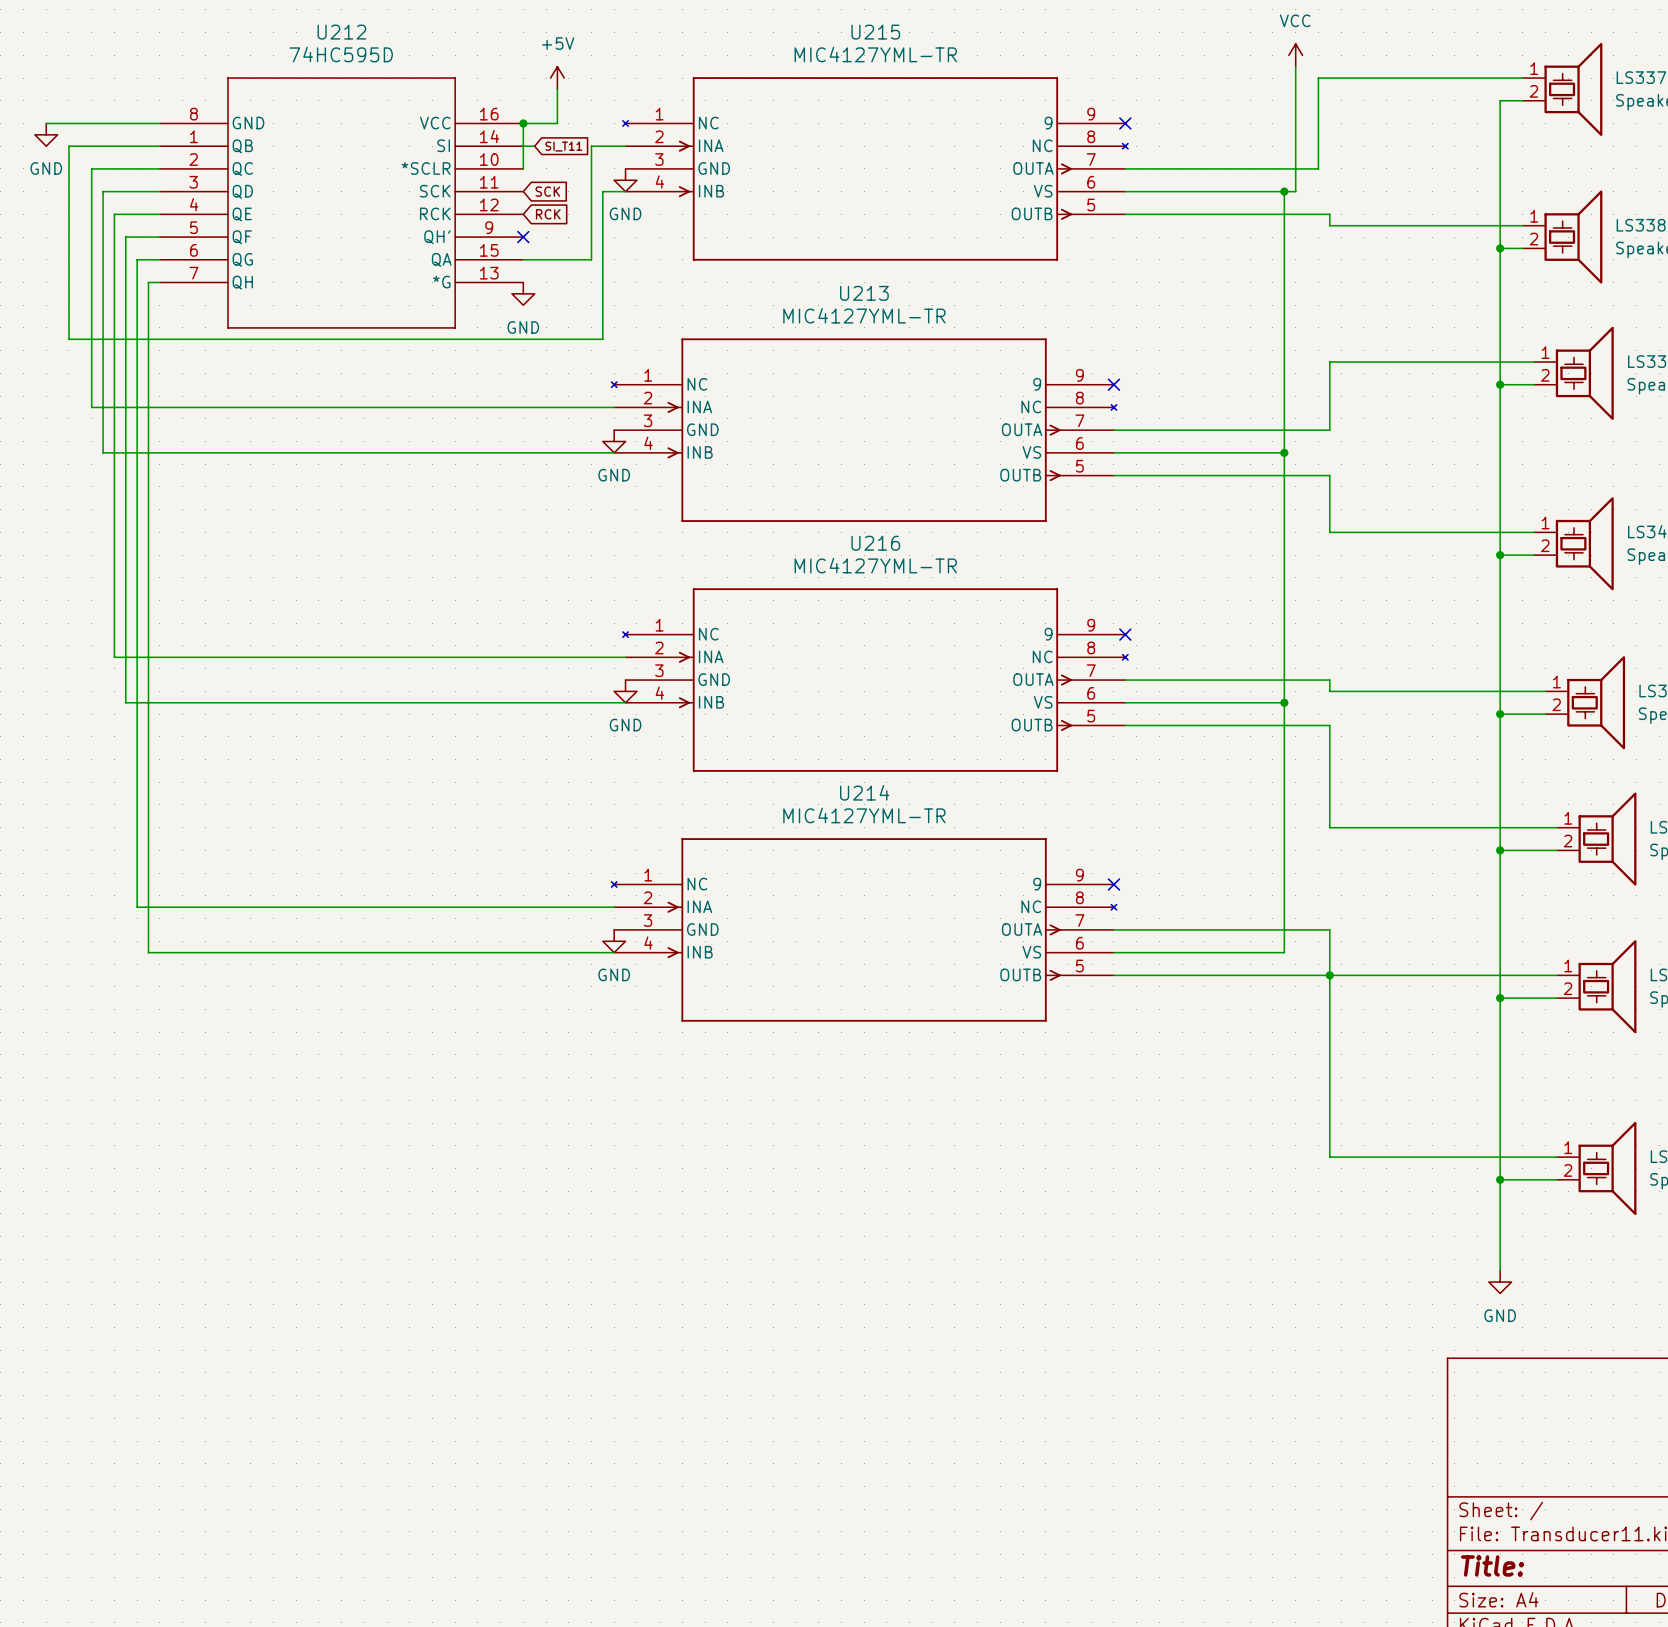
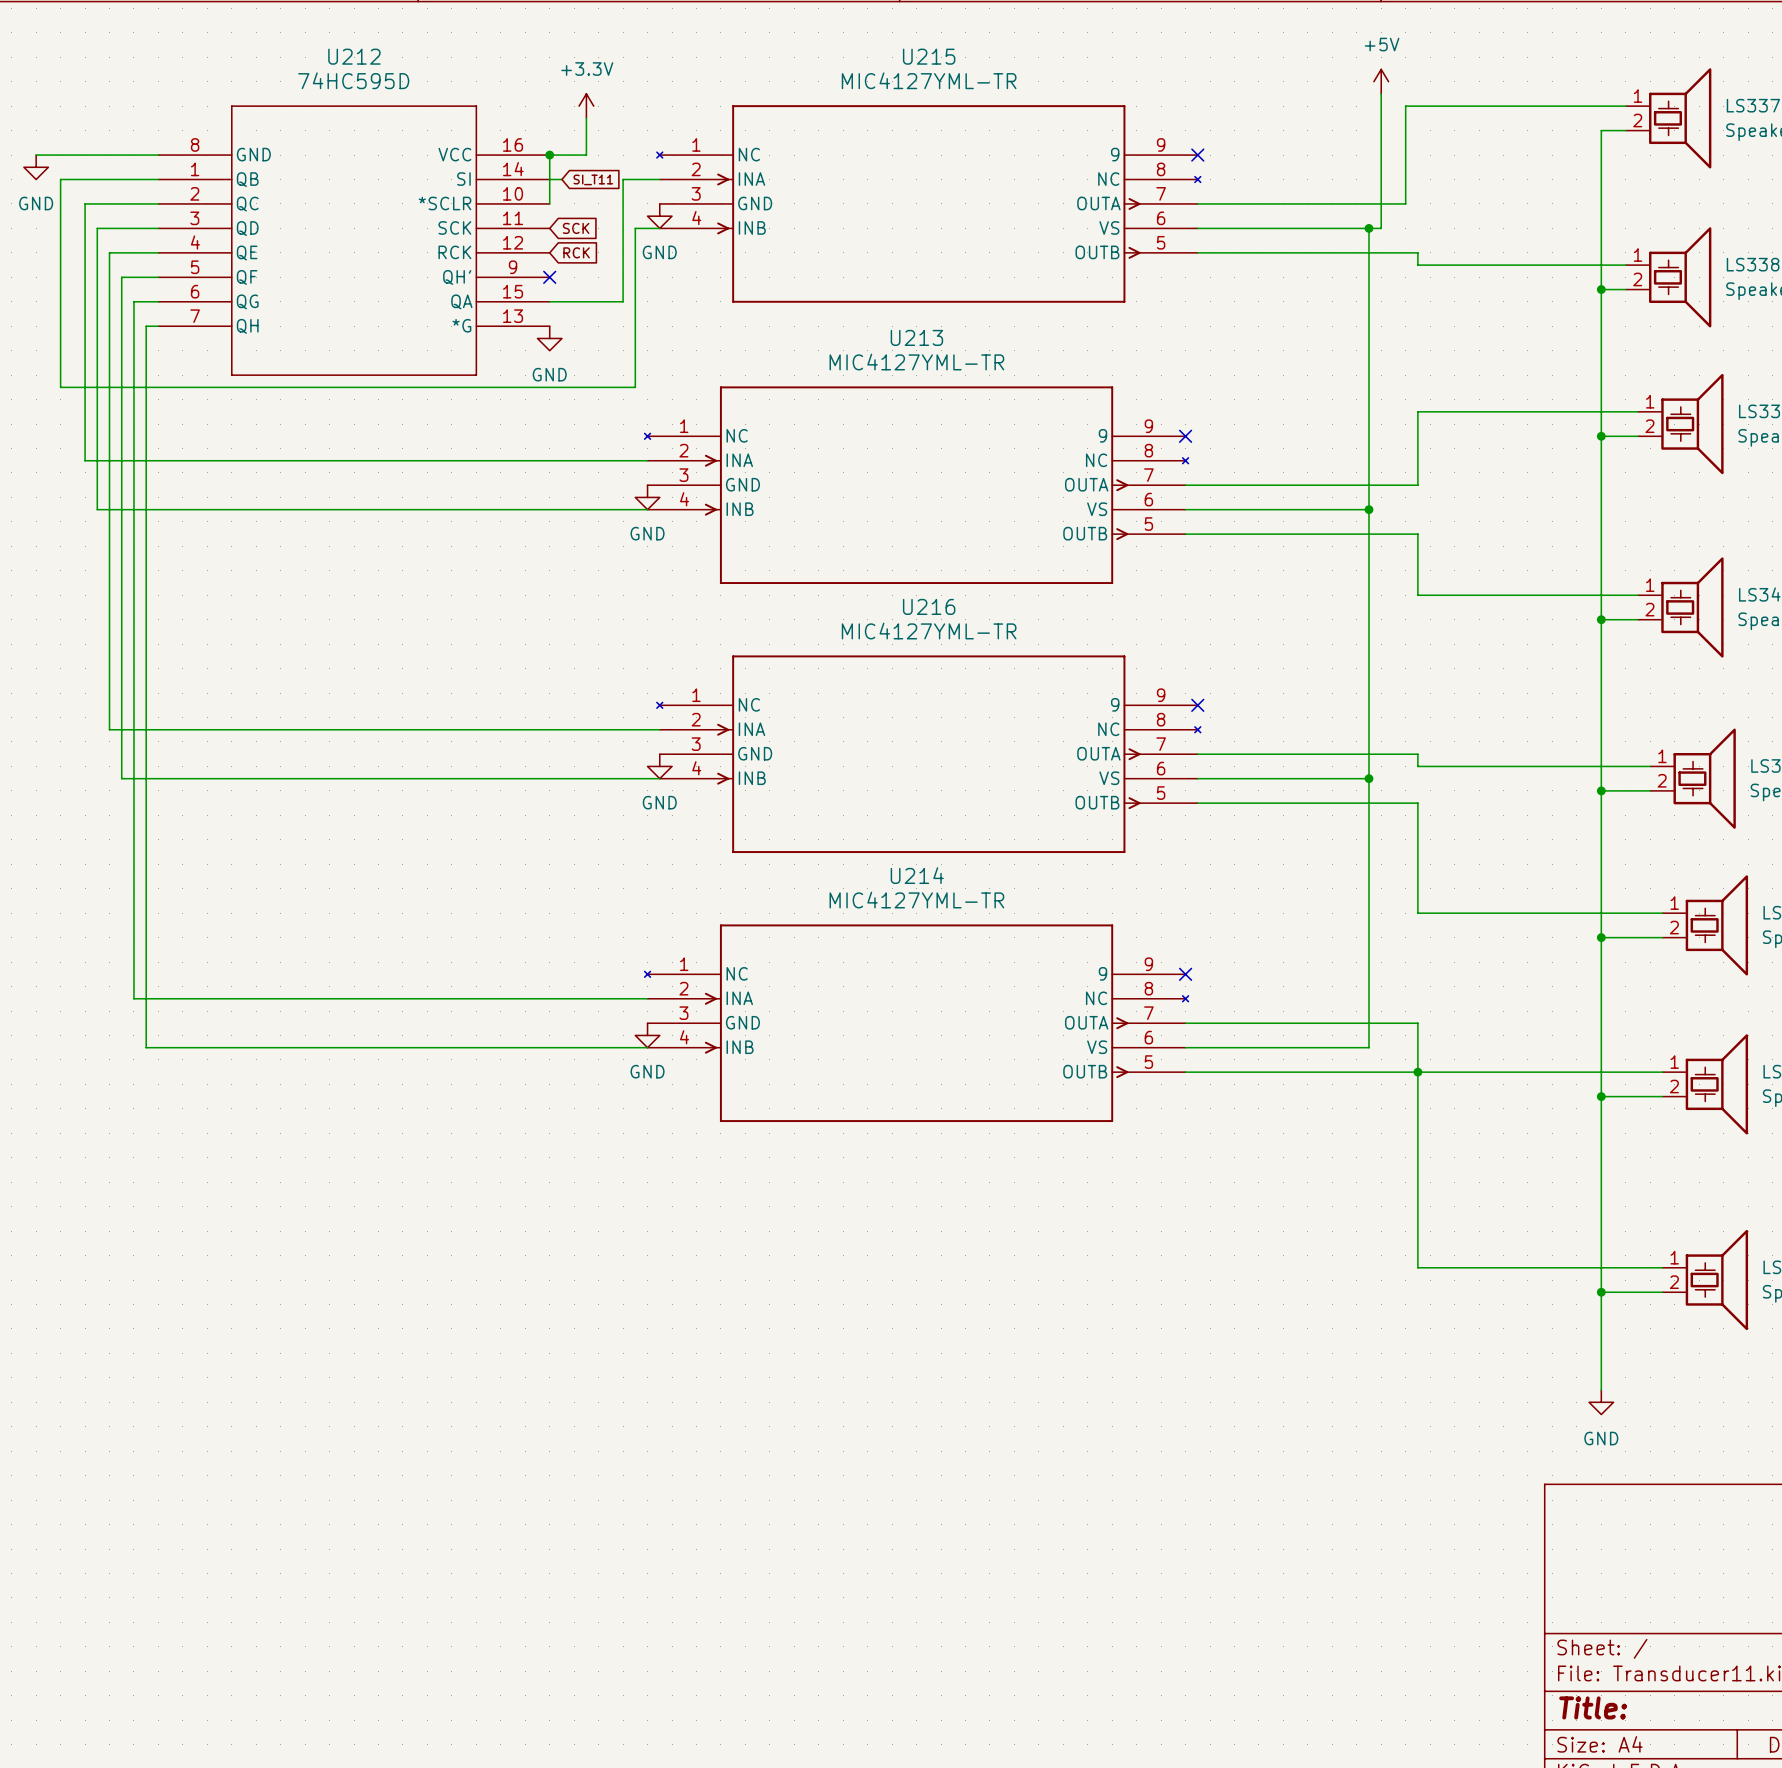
power symbol: VCC (1295, 55) -> +5V (1381, 81)
power symbol: +5V (557, 78) -> +3.3V (586, 106)

